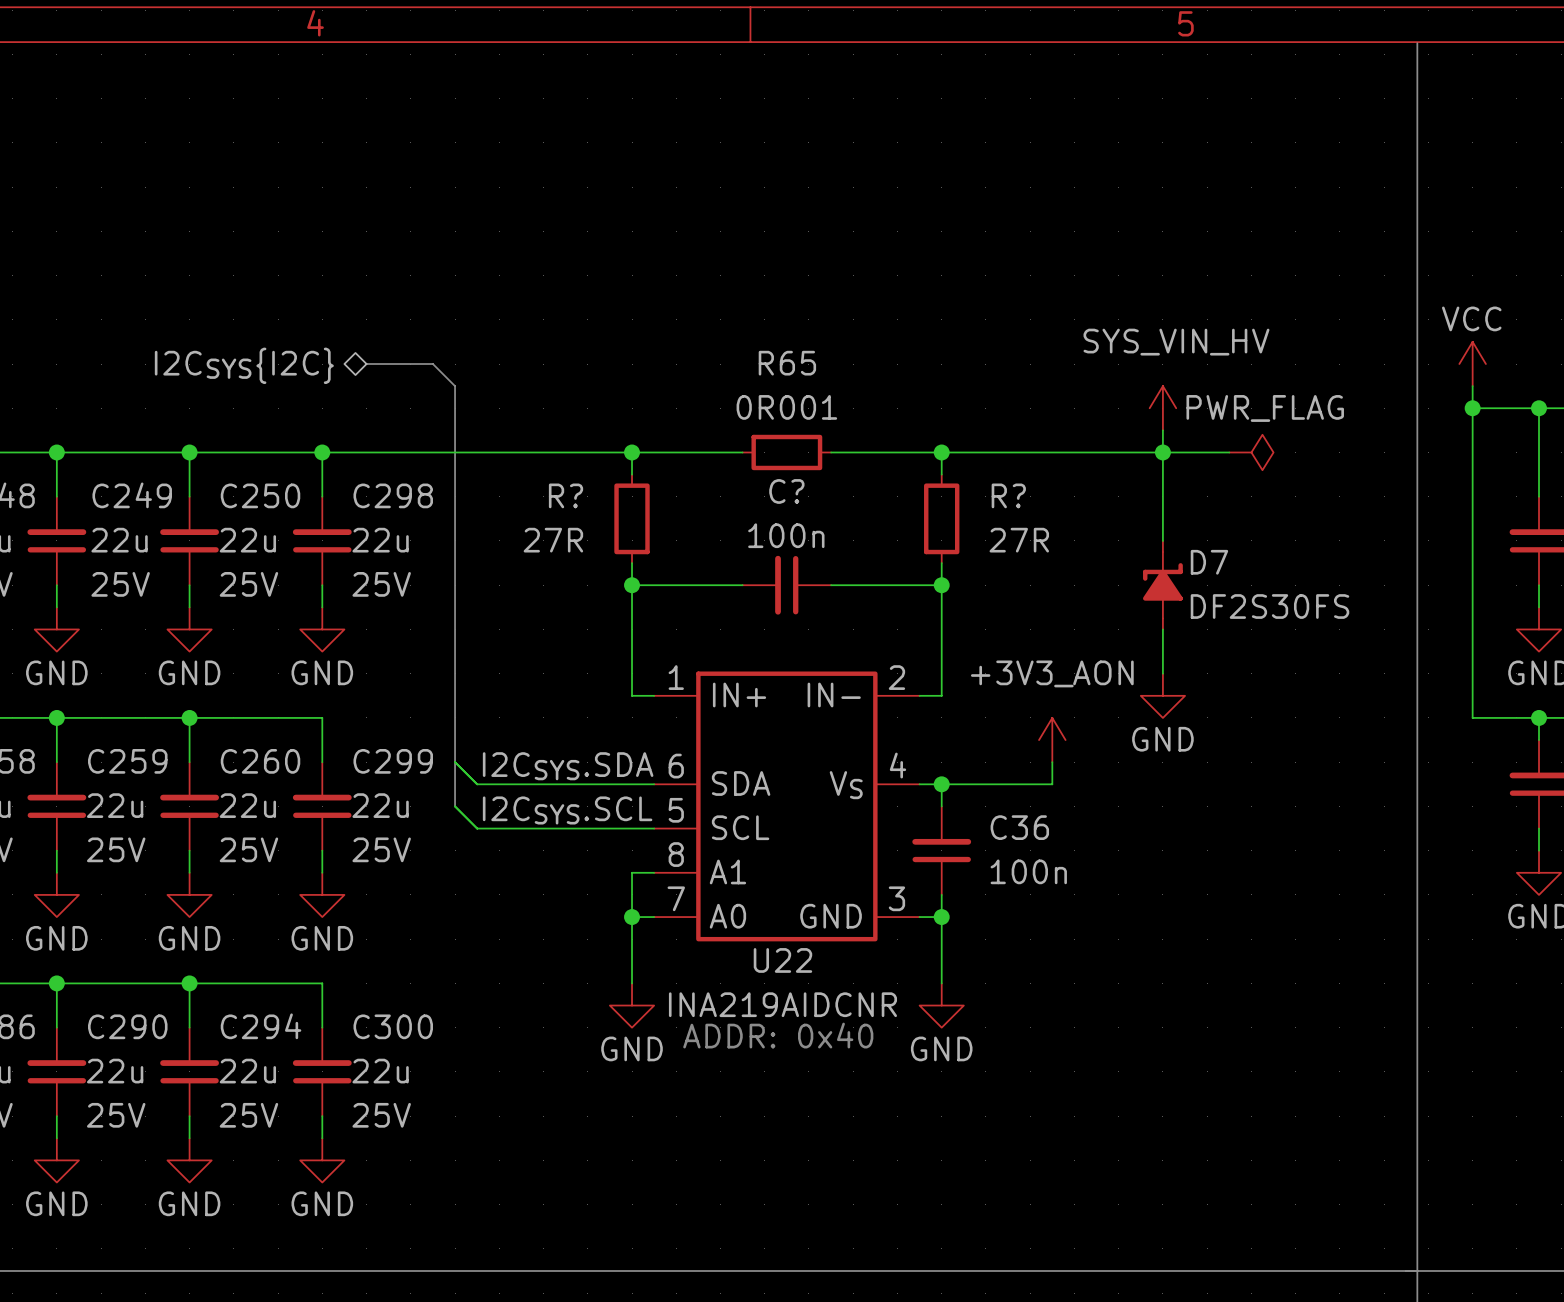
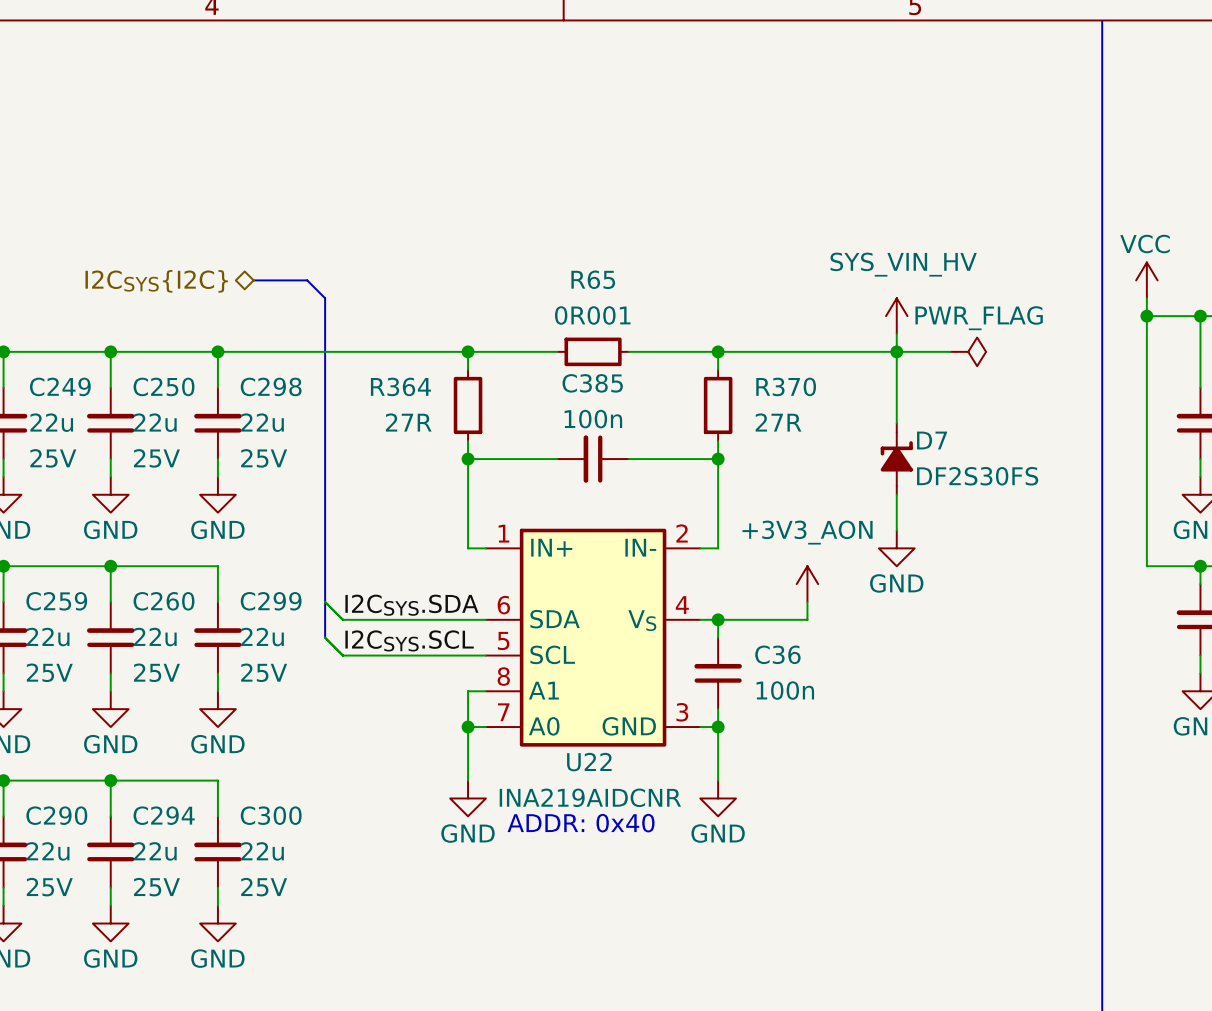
C? name: C? (786, 491) -> C385 (592, 383)
R? name: R? (566, 495) -> R364 (400, 386)
R? name: R? (1008, 495) -> R370 (786, 386)

